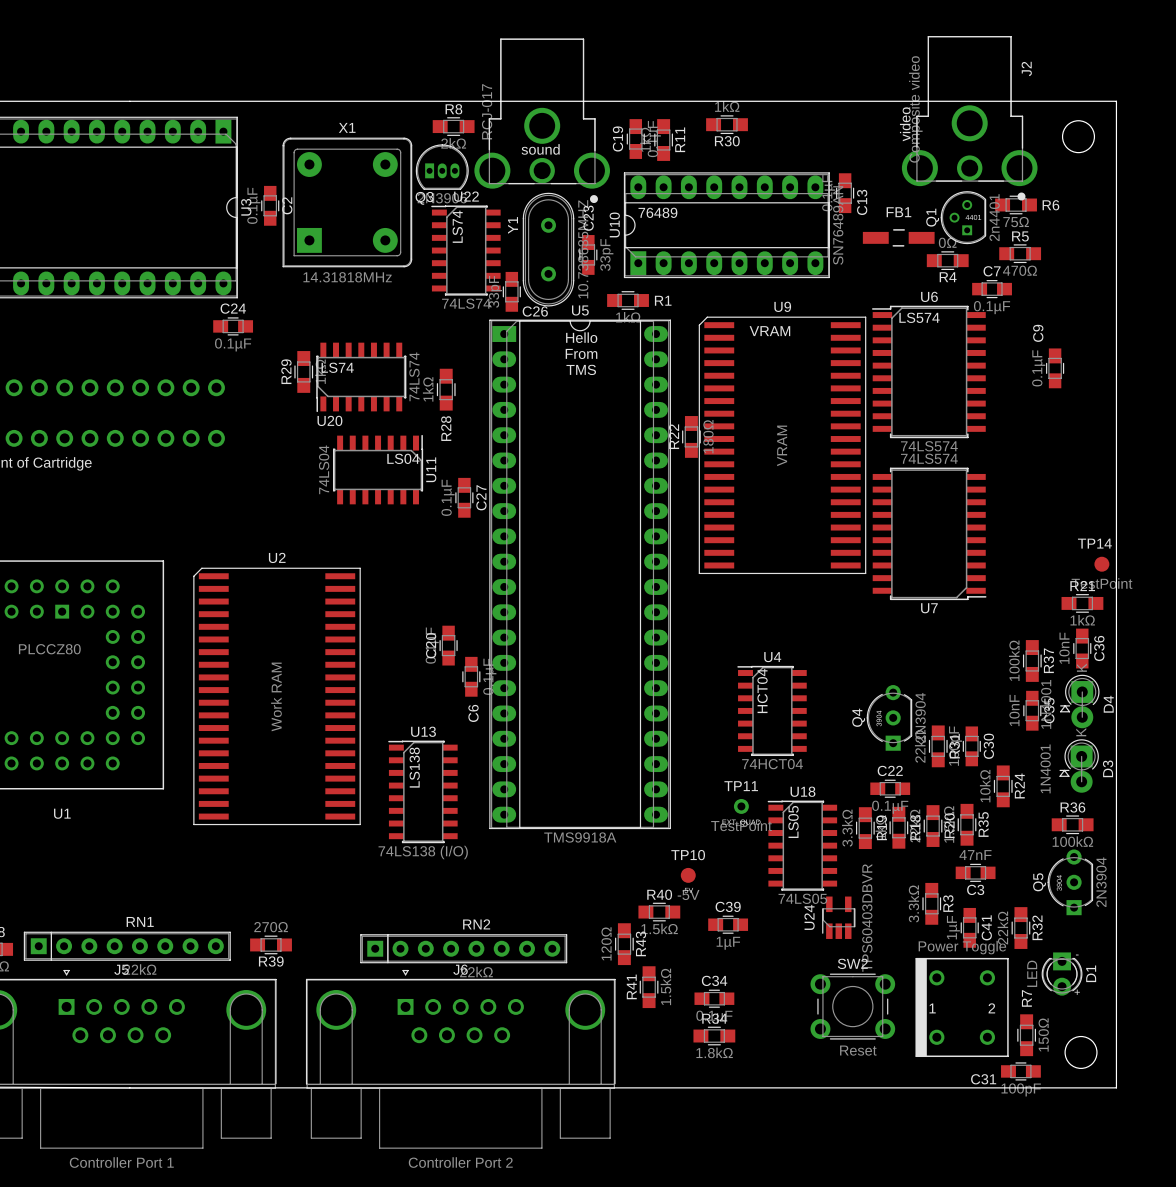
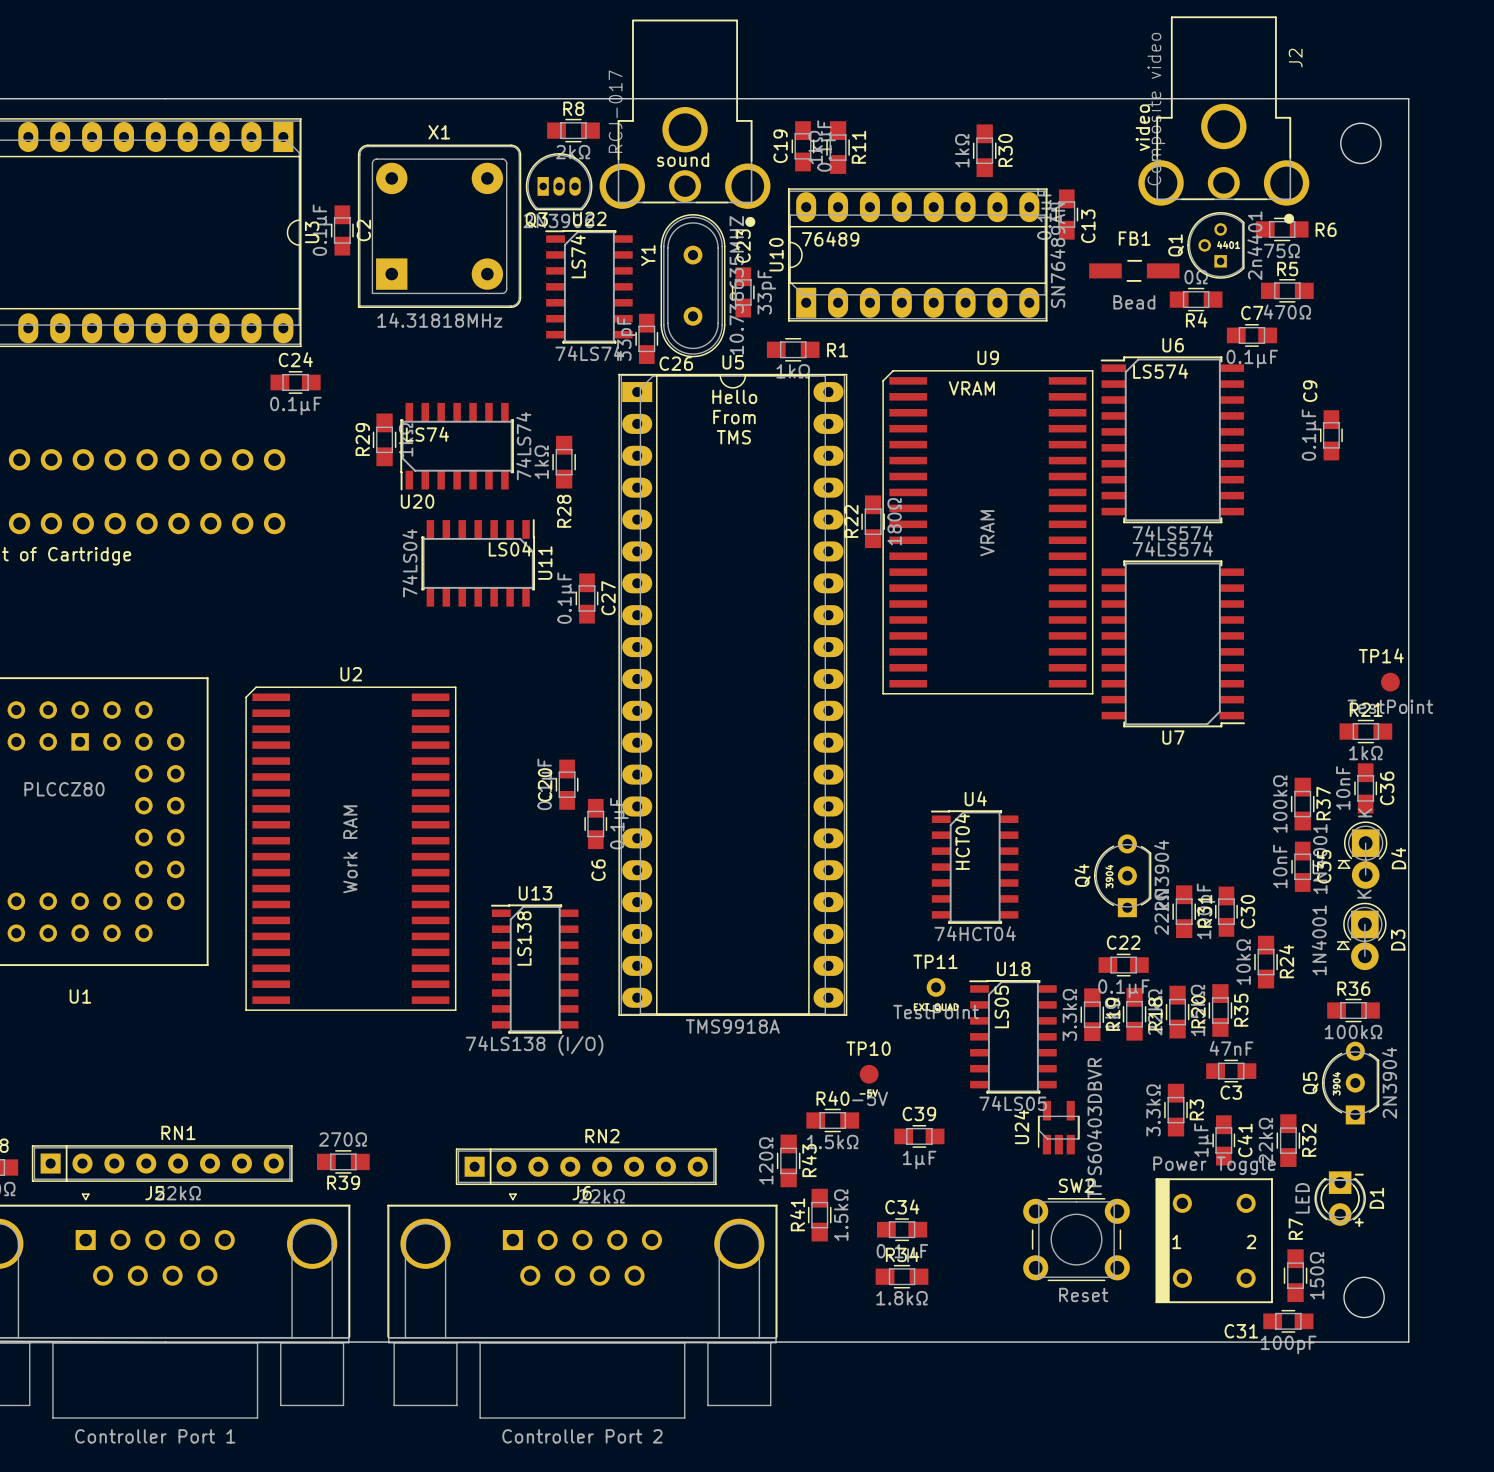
R30 value position: 1kΩ (727, 106) -> 1kΩ (962, 150)
R30 rotation: 0° (727, 124) -> 90° clockwise (984, 150)
R30 position: (727, 124) -> (984, 150)
R30 name position: R30 (727, 141) -> R30 (1005, 150)
FB1 value: none -> Bead (1134, 302)

